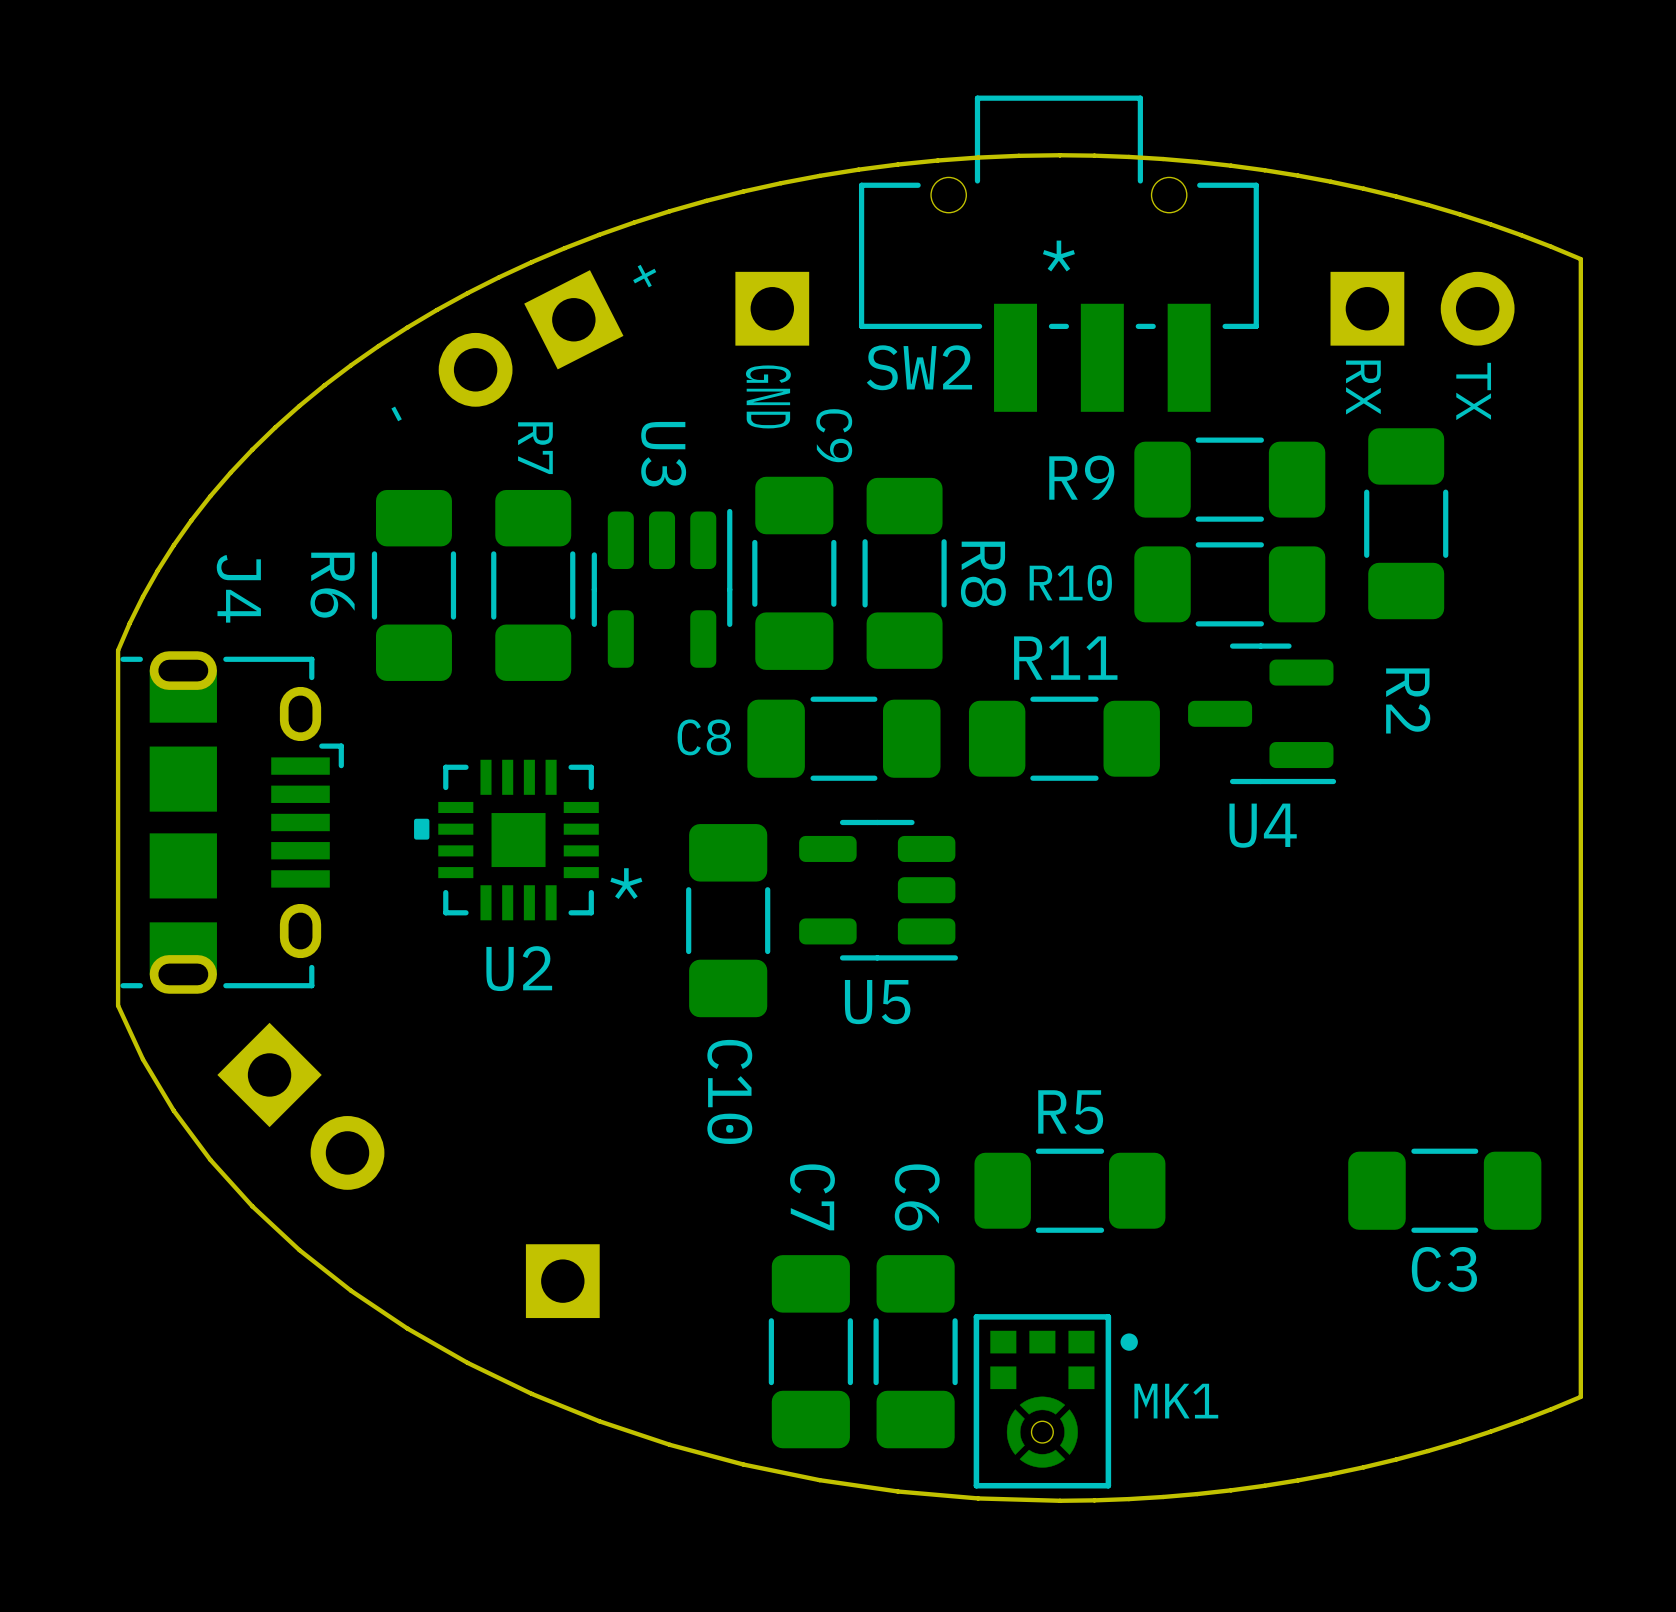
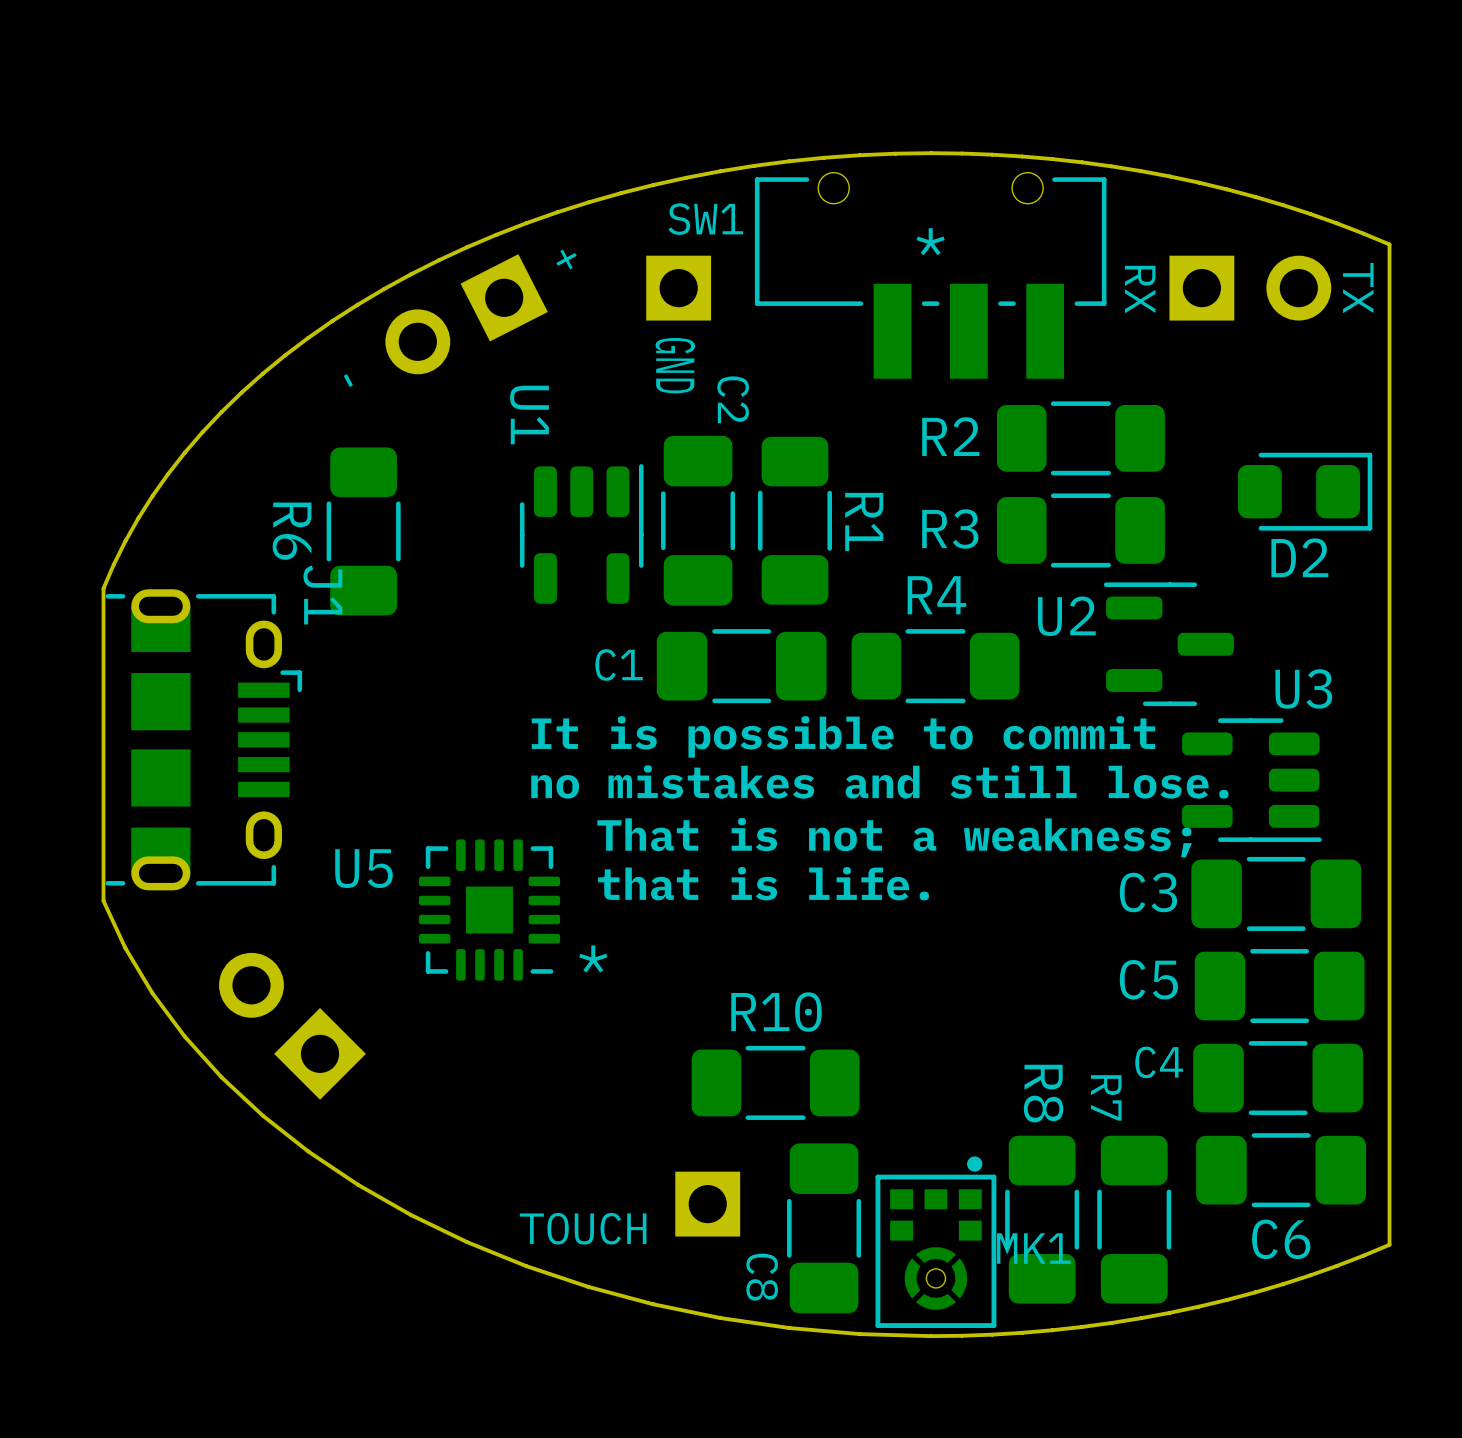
SW2: (1058, 253) -> none
SW1: none -> (930, 275)
text position: RX (1363, 387) -> RX (1140, 289)
text position: TX (1473, 391) -> TX (1358, 288)
C9 name: C9 (834, 435) -> C2 (733, 399)
R7 name position: R7 (535, 448) -> R7 (1106, 1097)
U3 name: U3 (663, 454) -> U1 (529, 415)
R9 name: R9 (1081, 477) -> R2 (950, 436)
R2: (1406, 523) -> none
D2: none -> (1305, 491)
R8 name: R8 (983, 574) -> R1 (864, 521)
R10 name: R10 (1070, 583) -> R3 (950, 529)
R7 position: (533, 585) -> (1134, 1219)
J4 name: J4 (238, 588) -> J1 (322, 594)
R11 name: R11 (1065, 658) -> R4 (936, 595)
U4: (1262, 713) -> none
C8 name: C8 (704, 737) -> C1 (619, 665)
U2 footprint: [414, 759, 599, 921] -> [1103, 582, 1234, 707]
U5 footprint: [799, 819, 958, 961] -> [418, 839, 561, 981]
text: none -> It is possible to commit (843, 736)
U3: none -> (1251, 780)
text: none -> no mistakes and still lose. (879, 781)
C10: (728, 920) -> none
text: none -> That is not a weakness; (894, 837)
U2 name position: U2 (519, 968) -> U2 (1066, 616)
text: none -> that is life. (763, 883)
U5 name position: U5 (877, 1002) -> U5 (363, 868)
text: none -> * (593, 959)
C5: none -> (1279, 986)
part rotation: 0° (300, 1106) -> 180° (292, 1026)
R5: (1069, 1190) -> none
C3 position: (1444, 1190) -> (1276, 893)
C6 name position: C6 (917, 1197) -> C6 (1281, 1239)
C4: none -> (1278, 1078)
R10: none -> (775, 1082)
C3 name position: C3 (1444, 1269) -> C3 (1148, 892)
part position: (562, 1281) -> (707, 1204)
MK1 footprint: [973, 1314, 1138, 1489] -> [875, 1156, 997, 1328]
C7: (810, 1351) -> none
C6 rotation: 0° (915, 1351) -> 90° clockwise (1281, 1170)
C6 position: (915, 1351) -> (1281, 1170)
R8: none -> (1042, 1219)
text: none -> TOUCH (583, 1228)
C8: none -> (824, 1228)

